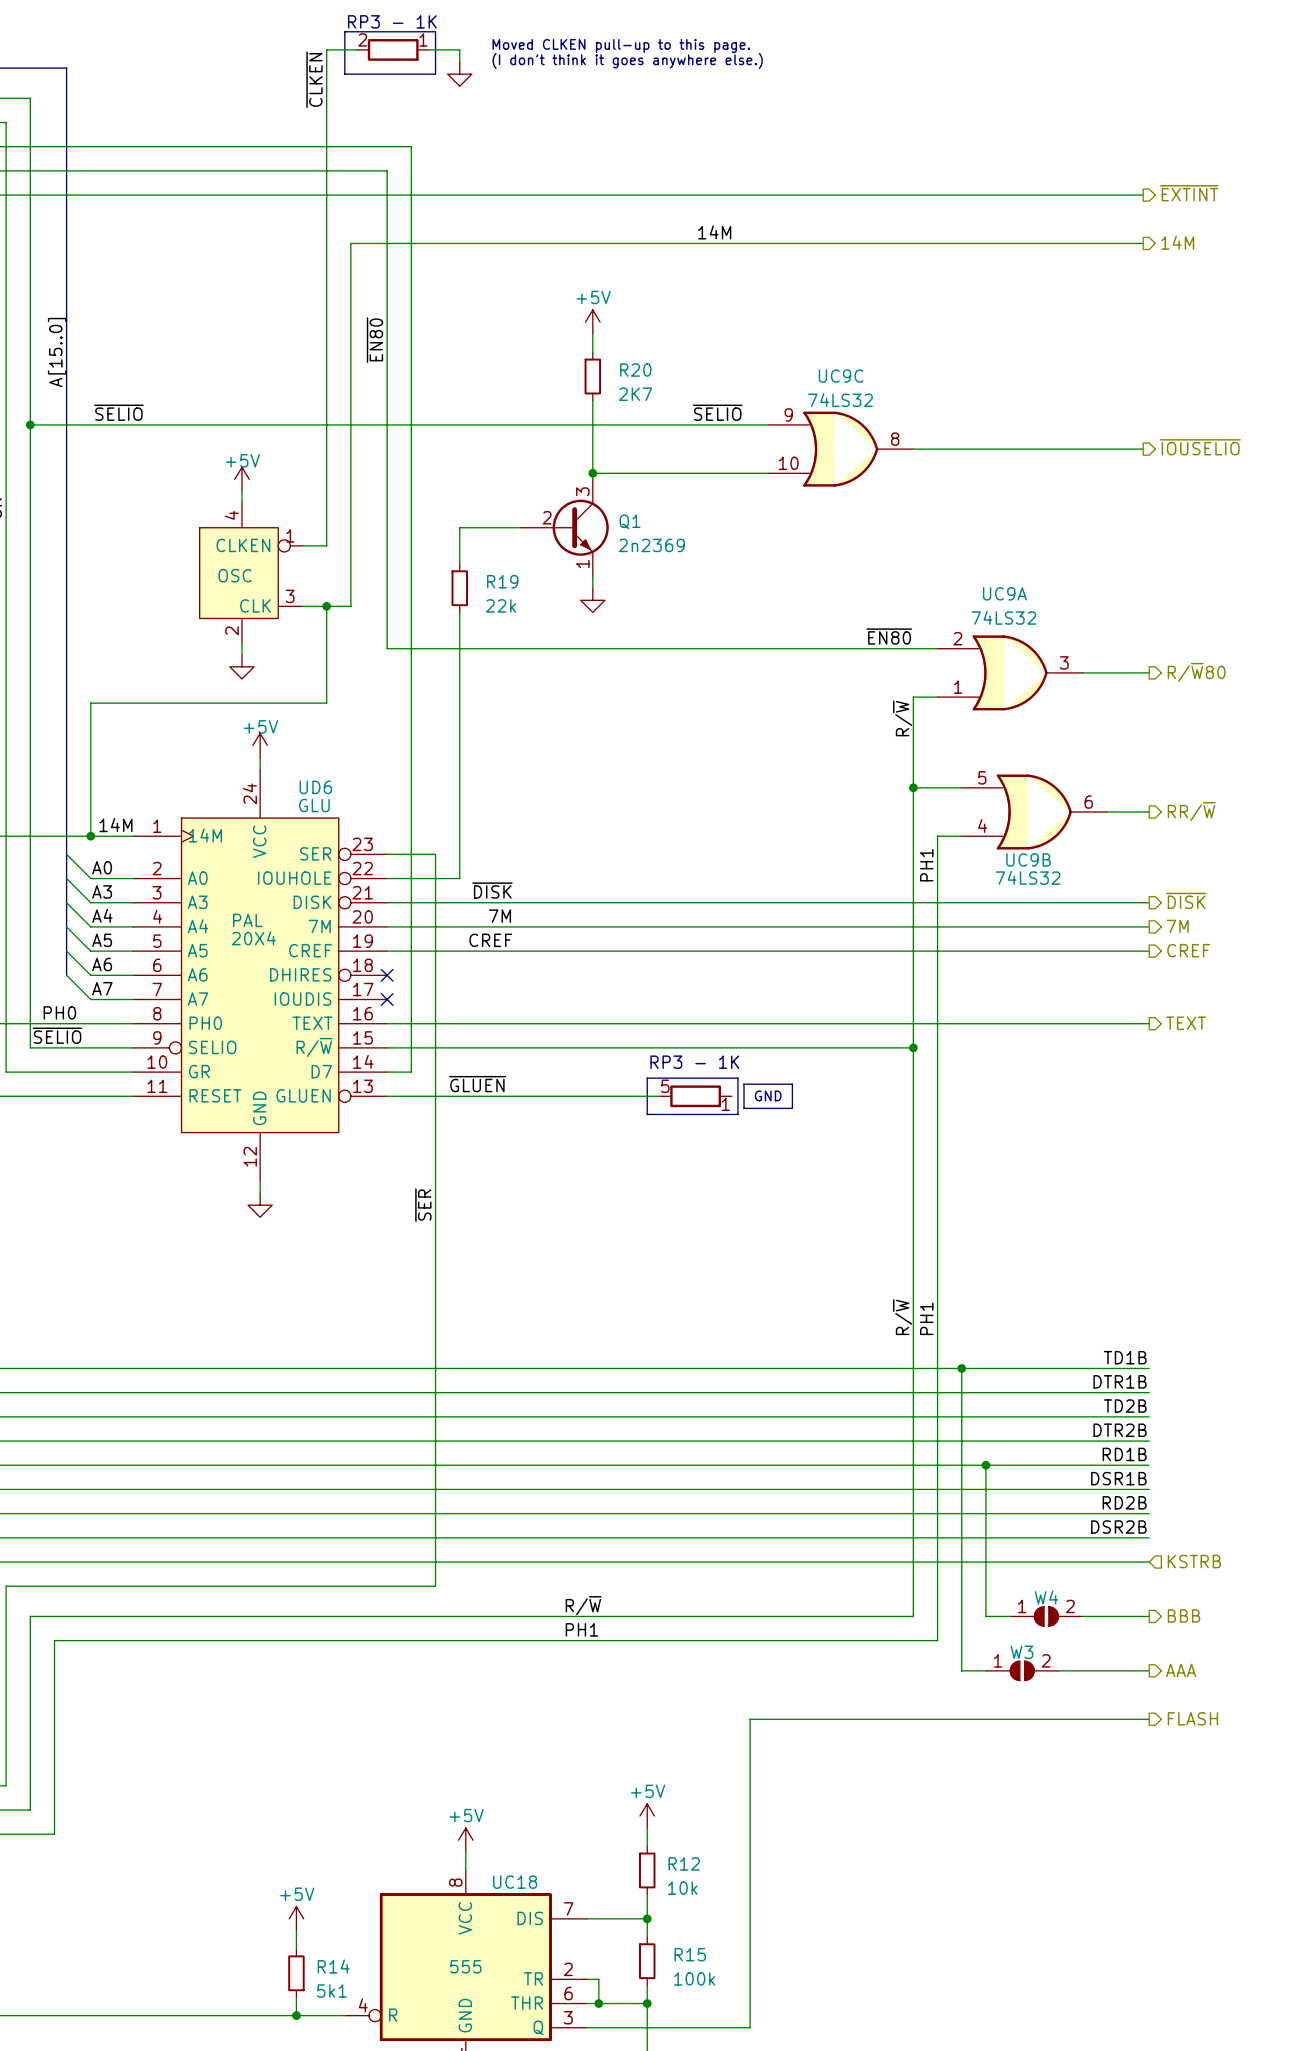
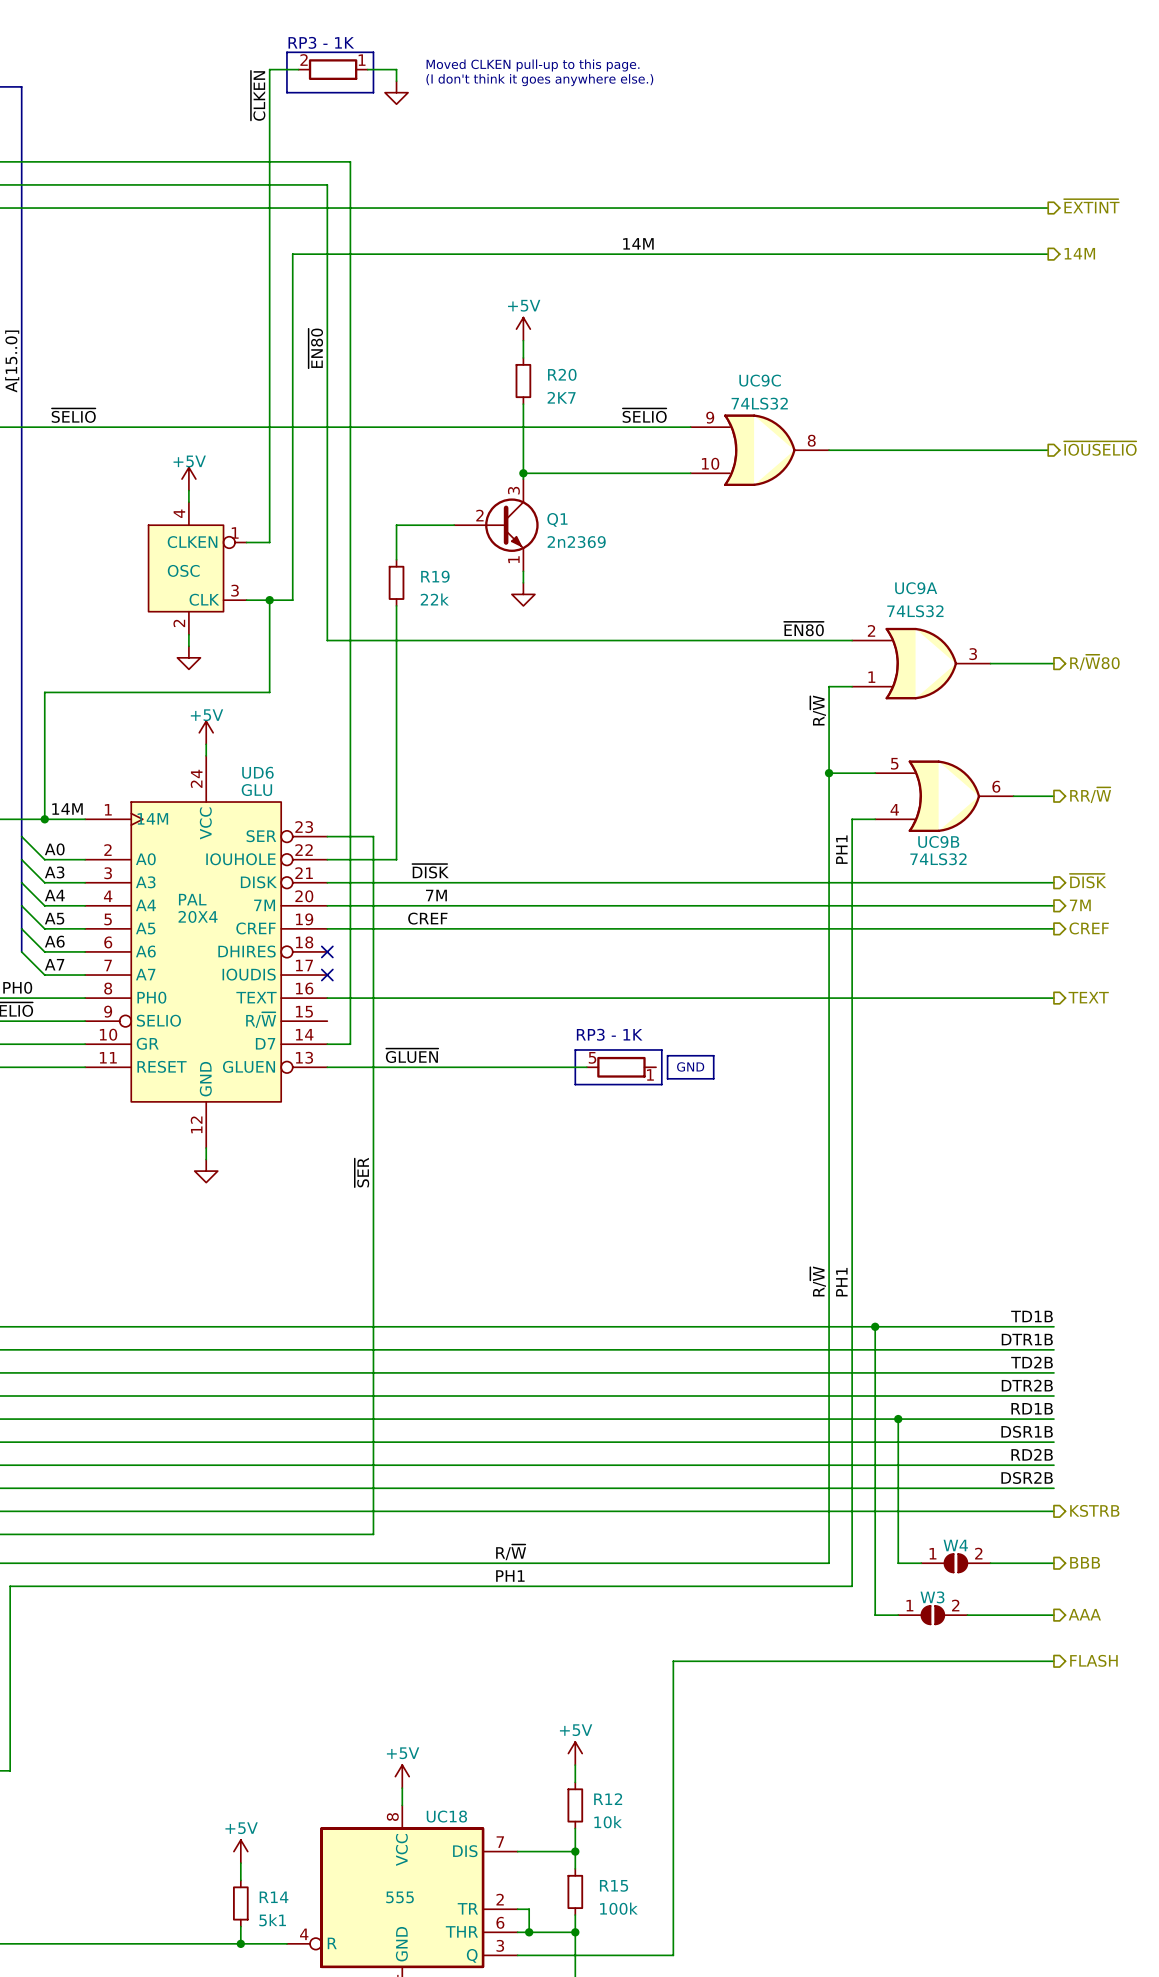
wire: (387, 1047) (913, 1047) -> none
junction: (913, 1047) -> none
hierarchical label shape: input (1194, 1561) -> output (1094, 1510)

